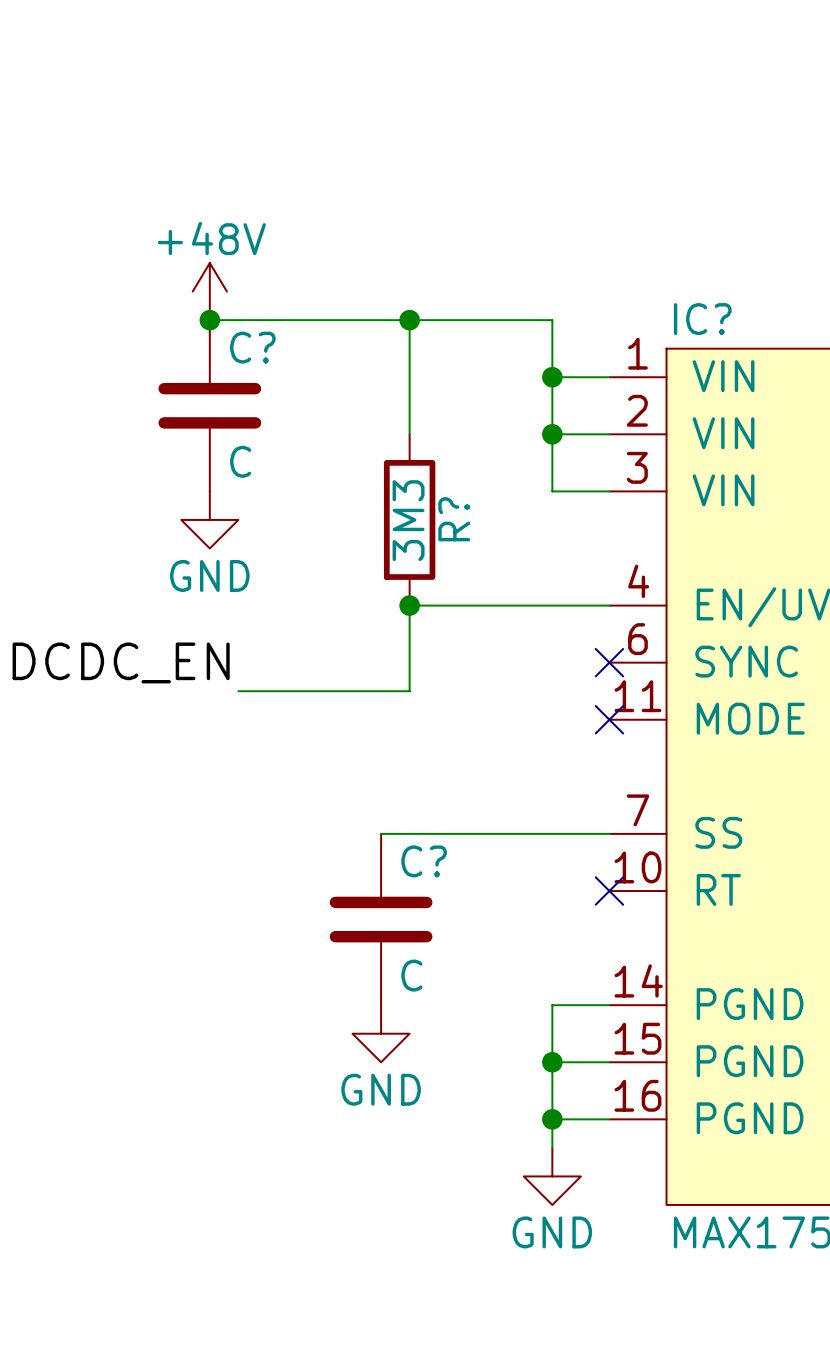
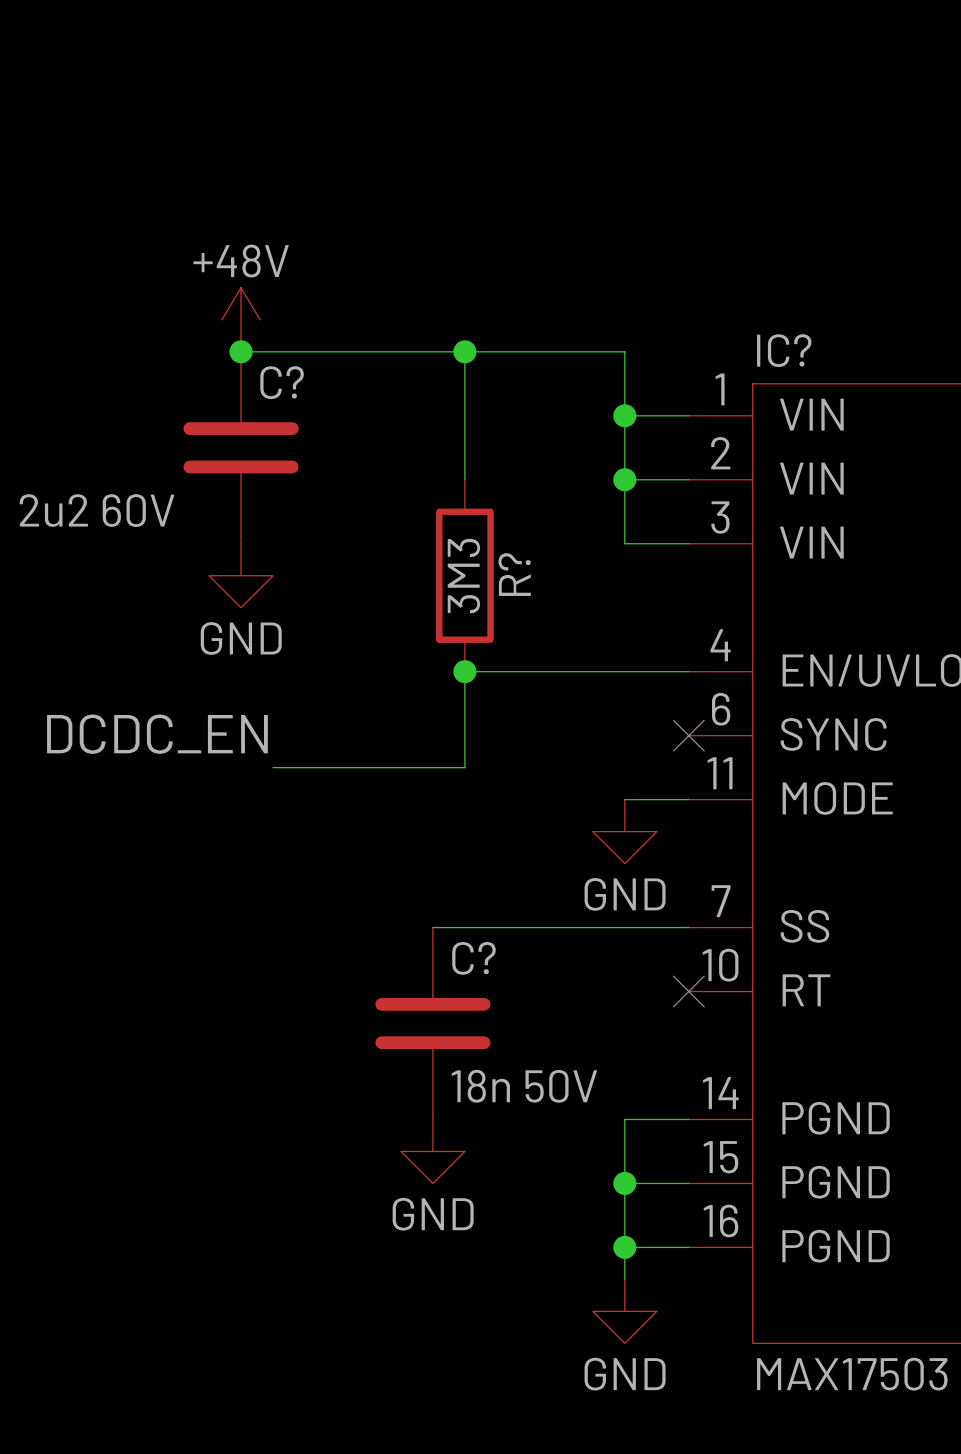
C? value: C (240, 461) -> 2u2 60V (97, 510)
wire: none -> (624, 799) (688, 799)
no-connect mark: (609, 719) -> none
power symbol: none -> GND (624, 831)
C? value: C (411, 975) -> 18n 50V (524, 1086)

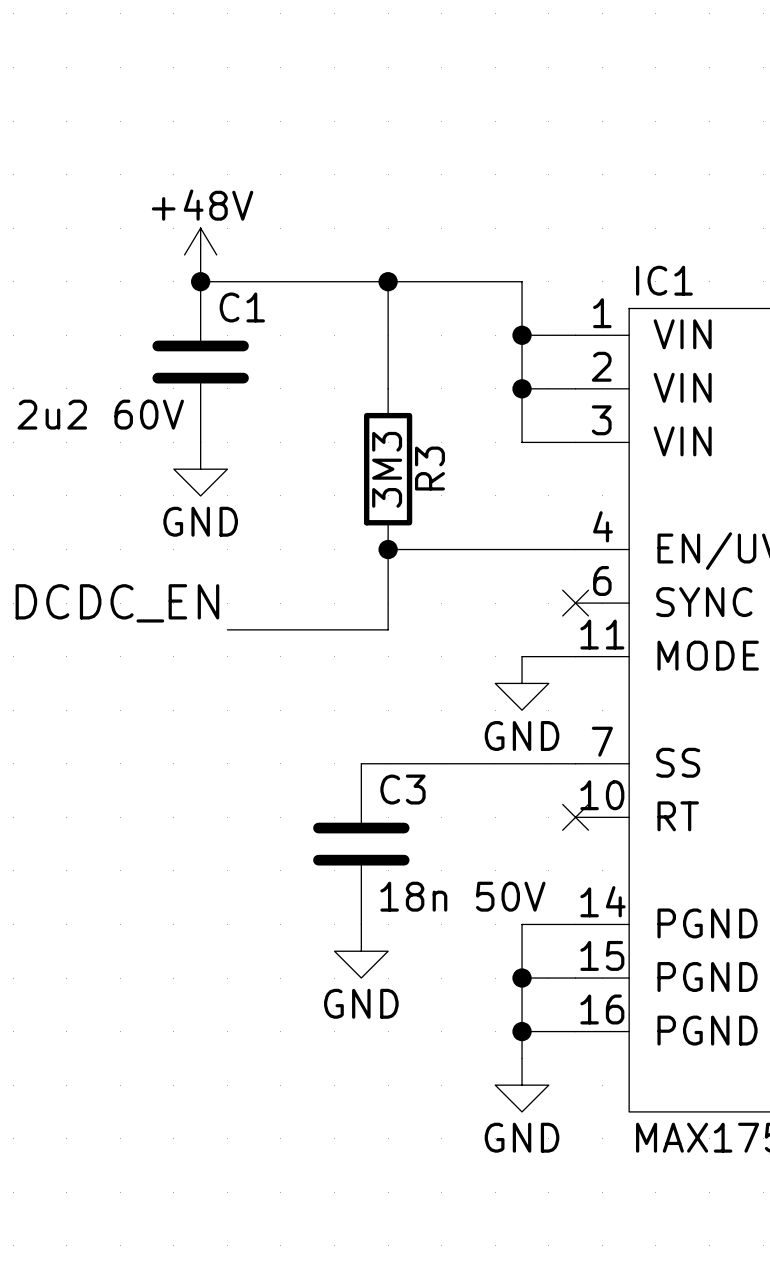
IC? name: IC? (784, 350) -> IC1 (664, 280)
C? name: C? (282, 382) -> C1 (242, 307)
R? name: R? (514, 574) -> R3 (429, 468)
C? name: C? (473, 958) -> C3 (402, 789)

